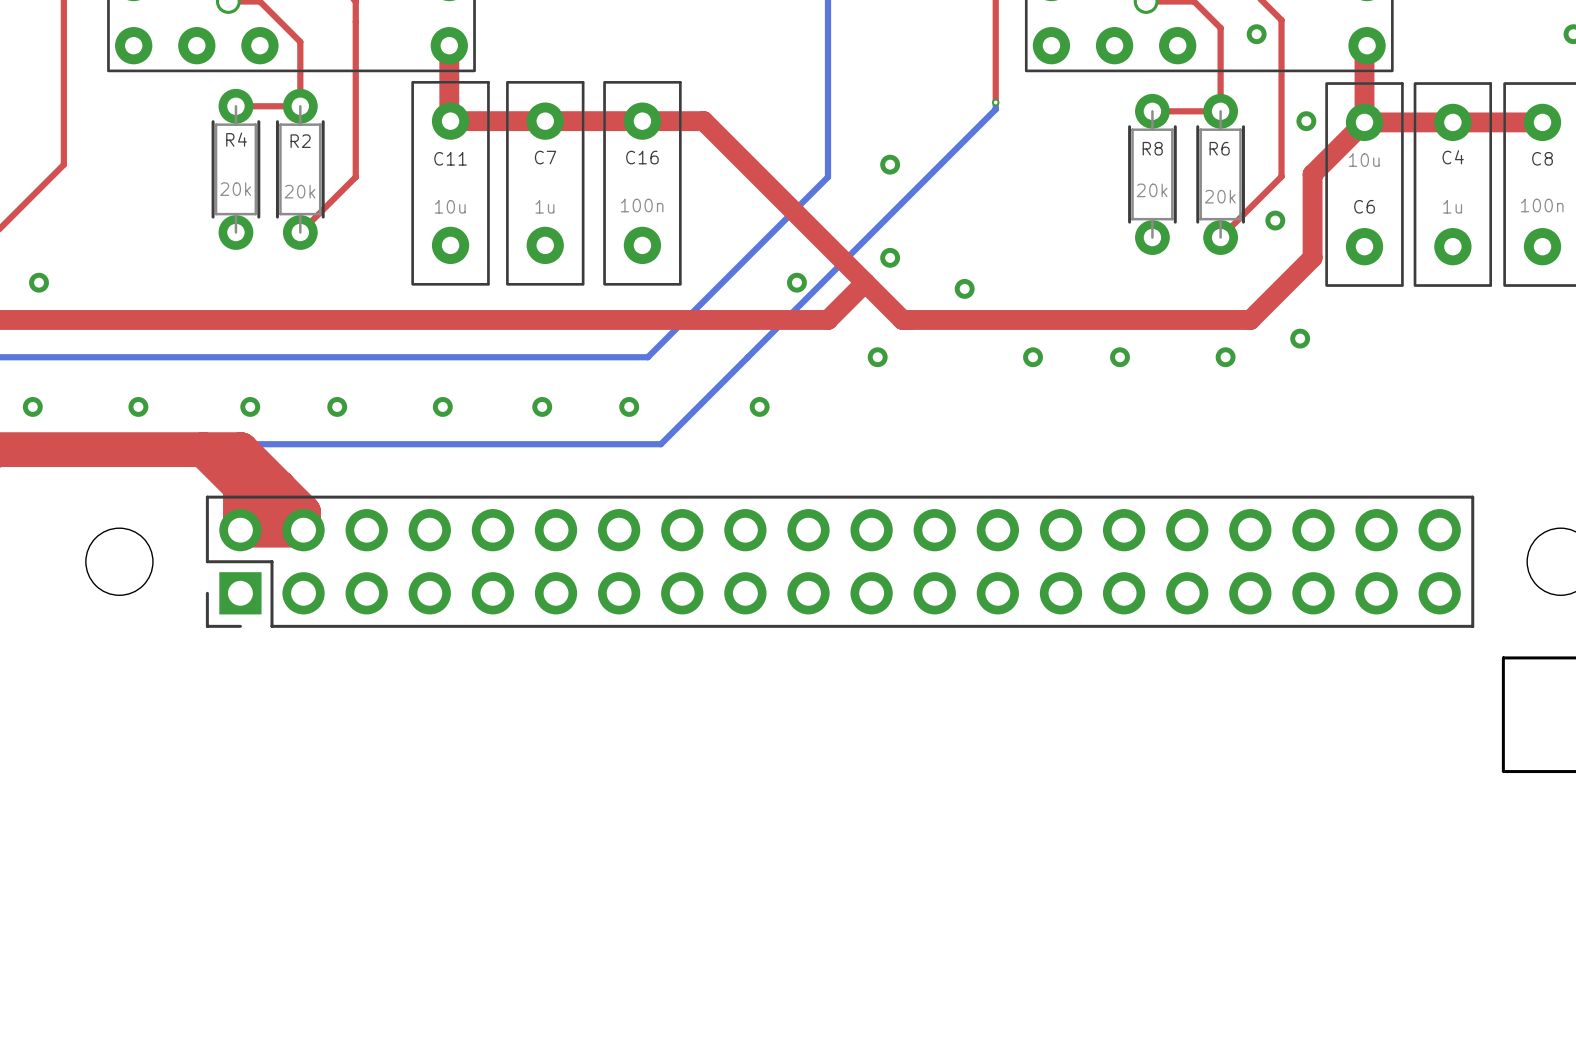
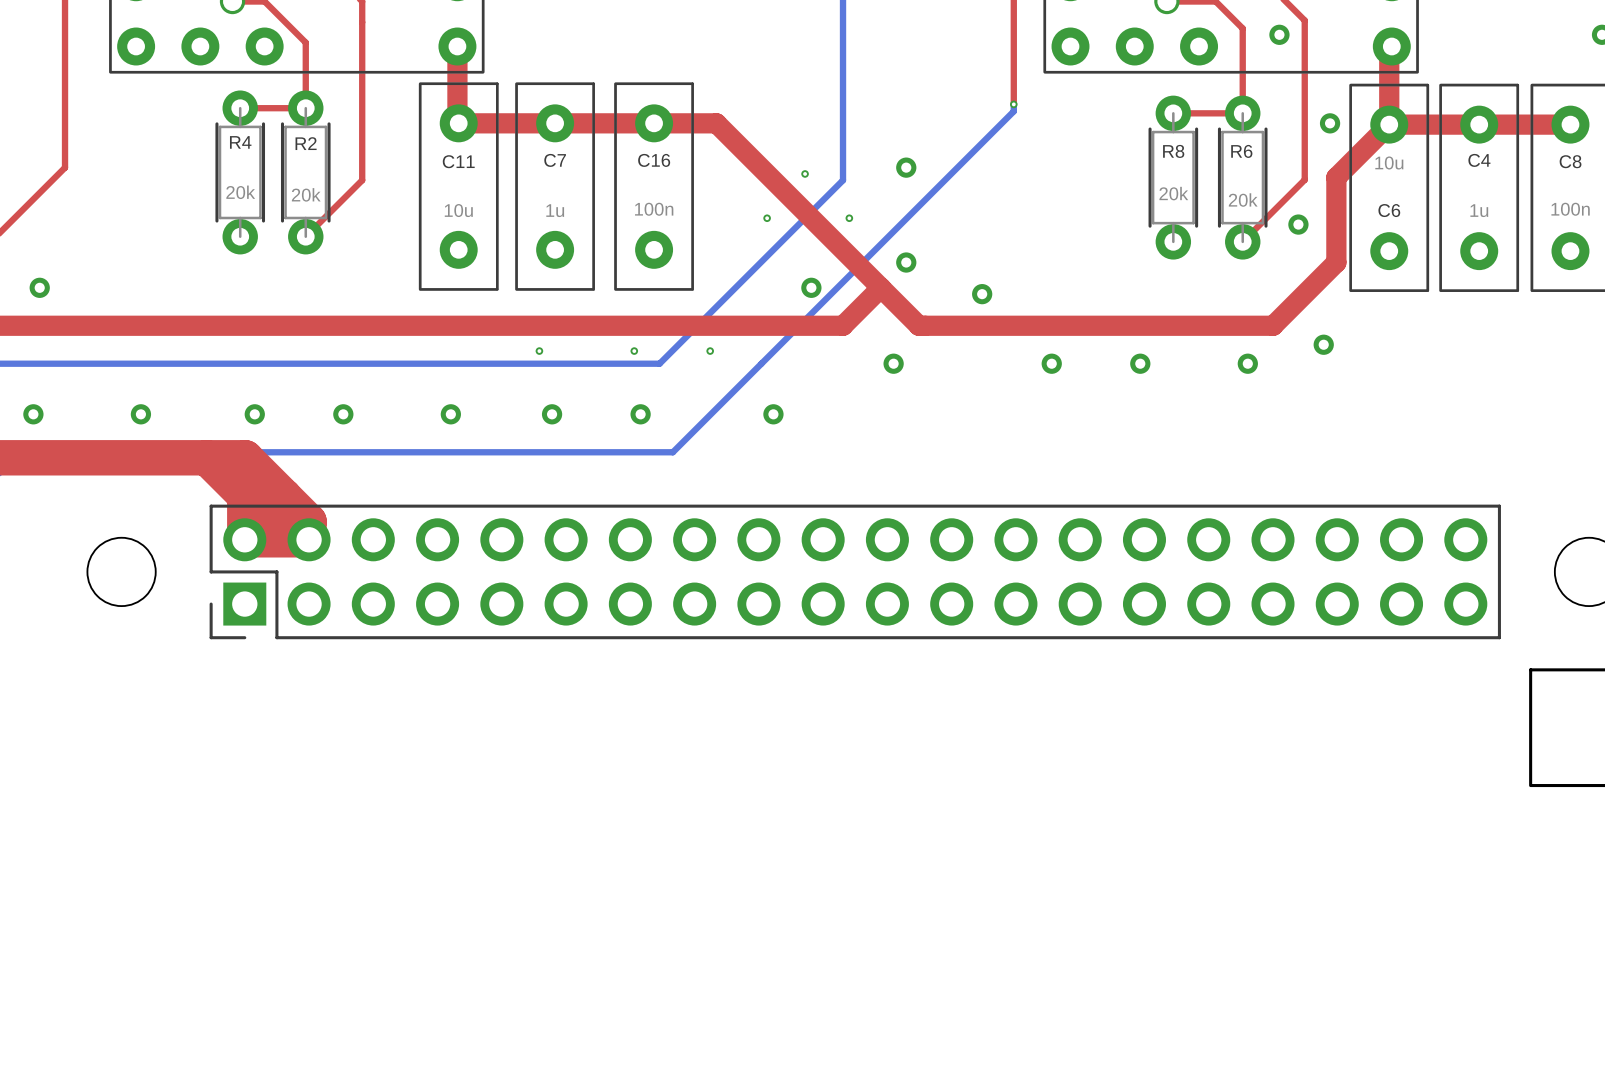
via: none -> (805, 173)
via: none -> (767, 218)
via: none -> (849, 218)
via: none -> (539, 351)
via: none -> (634, 351)
via: none -> (710, 351)

